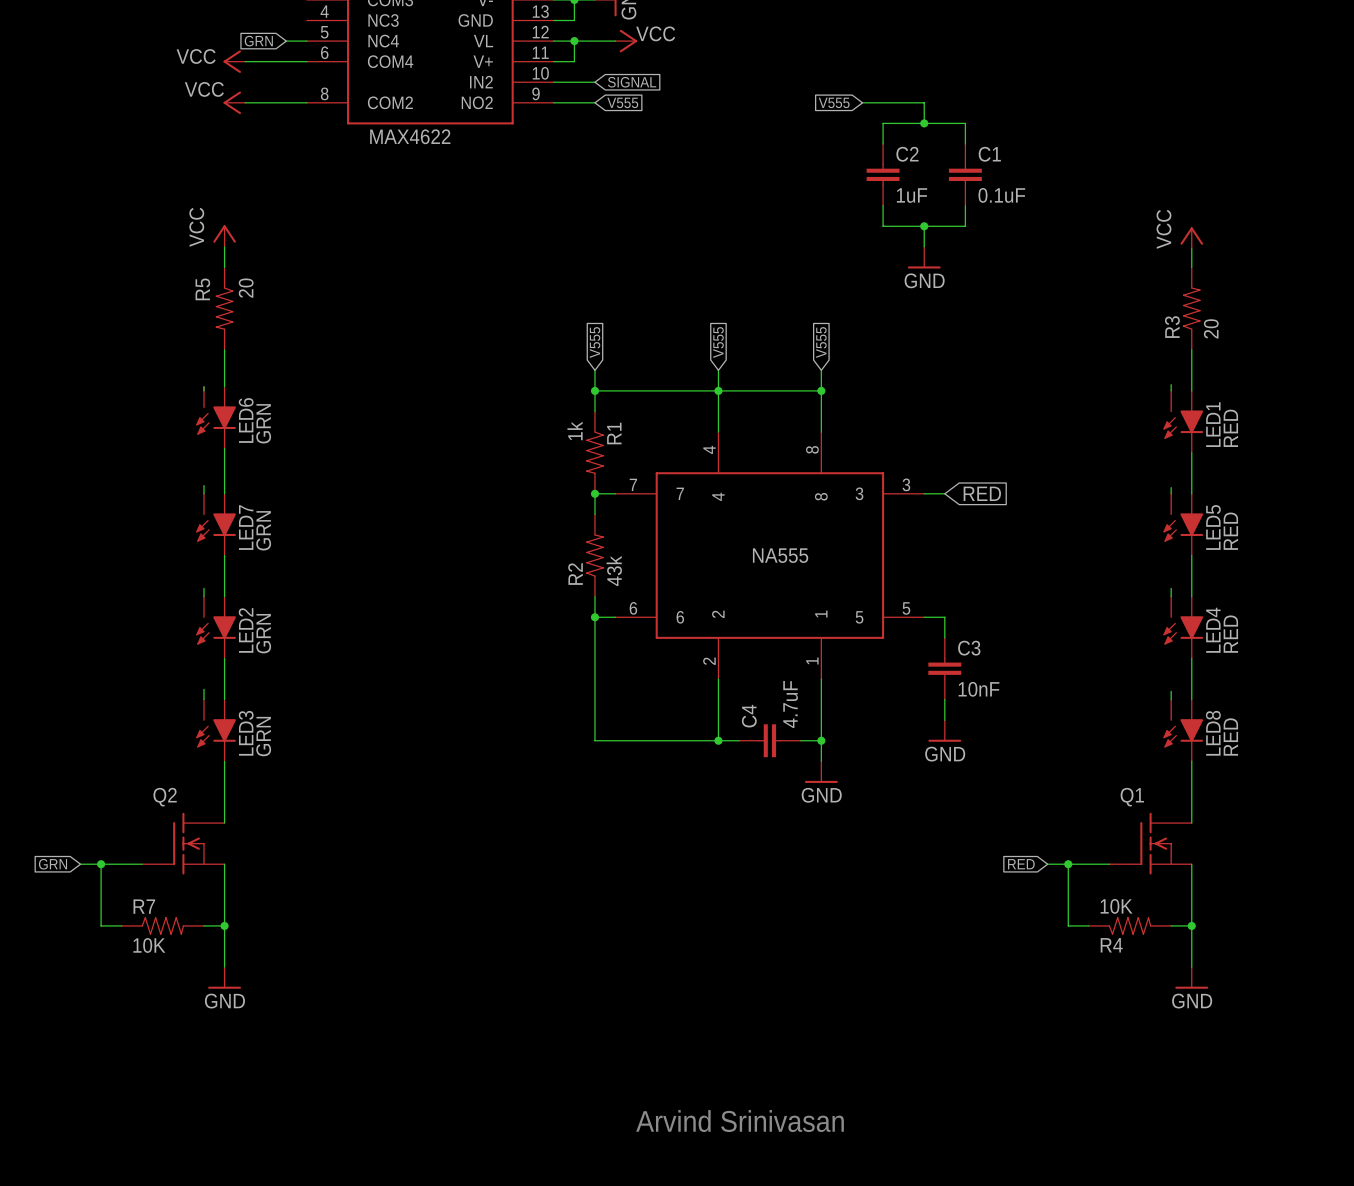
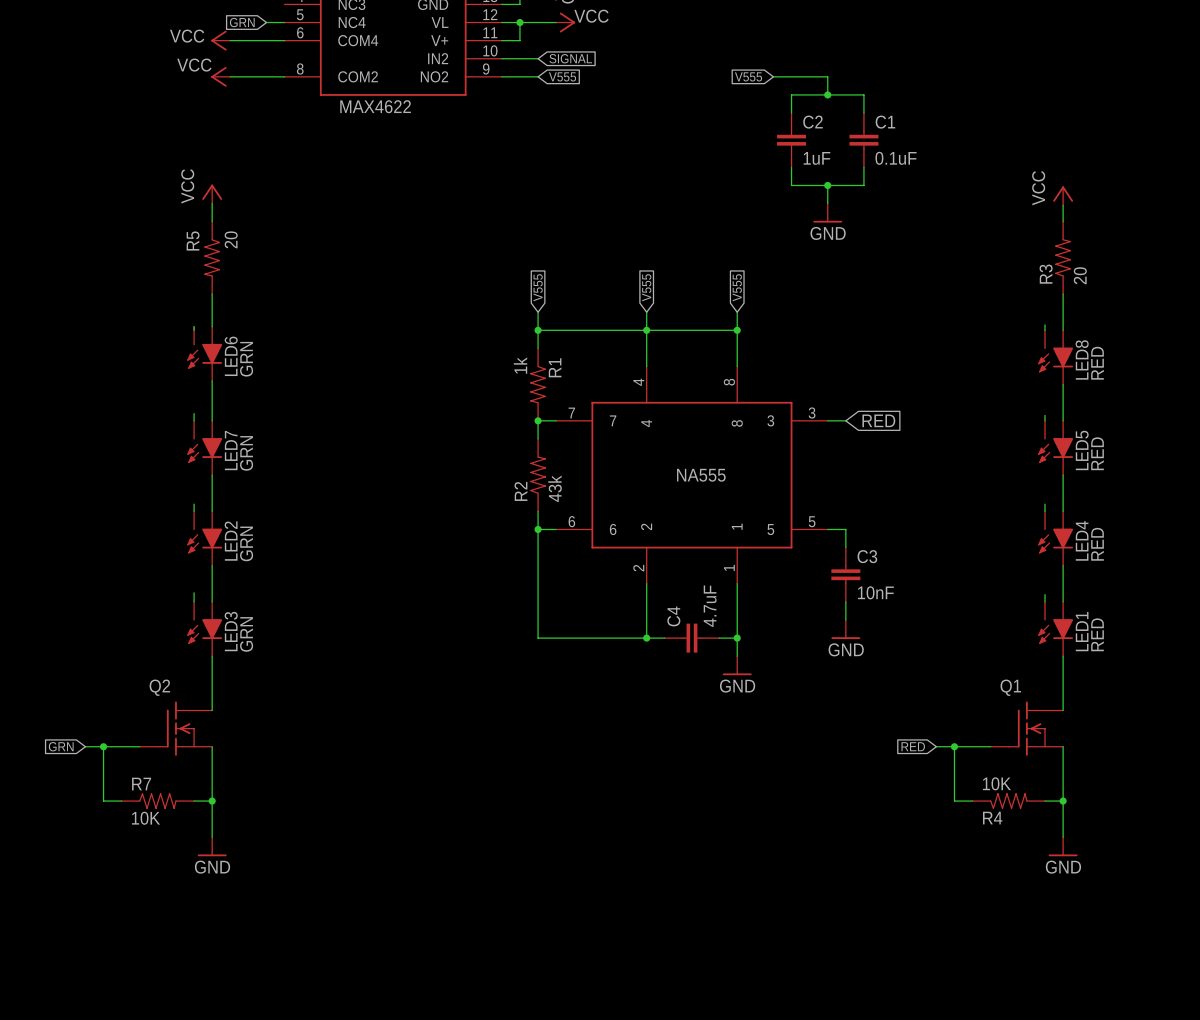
LED1 name: LED1 (1213, 424) -> LED8 (1082, 359)
LED8 name: LED8 (1213, 733) -> LED1 (1082, 631)
text: Arvind Srinivasan (740, 1121) -> none

